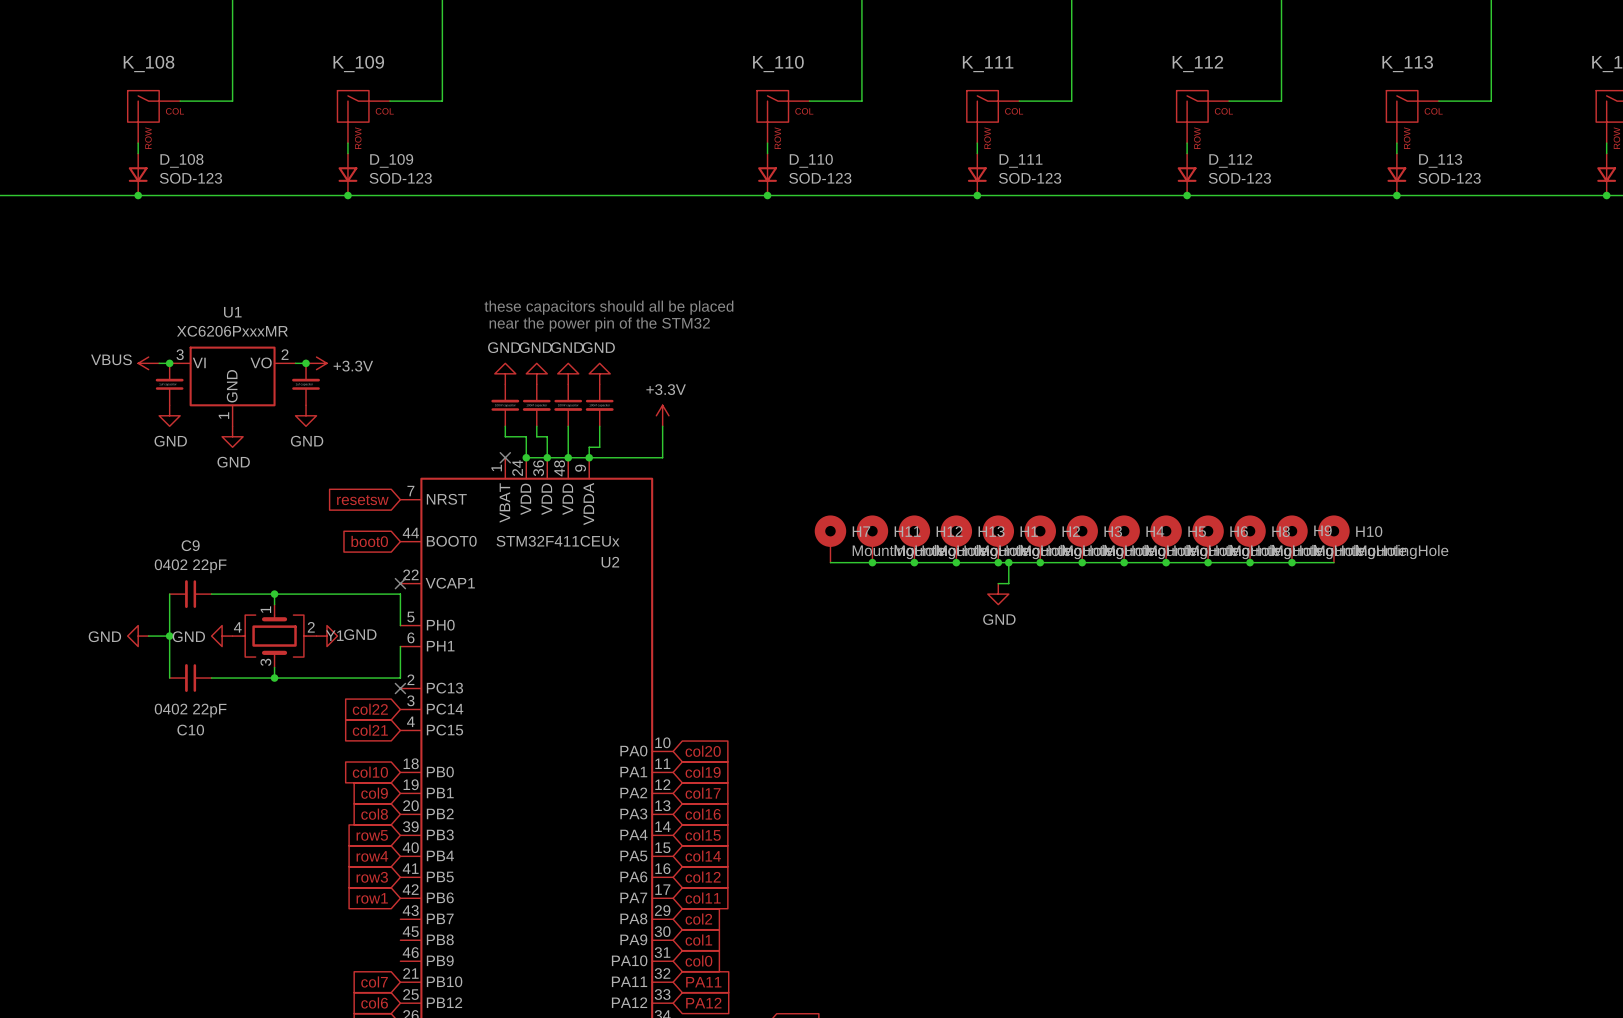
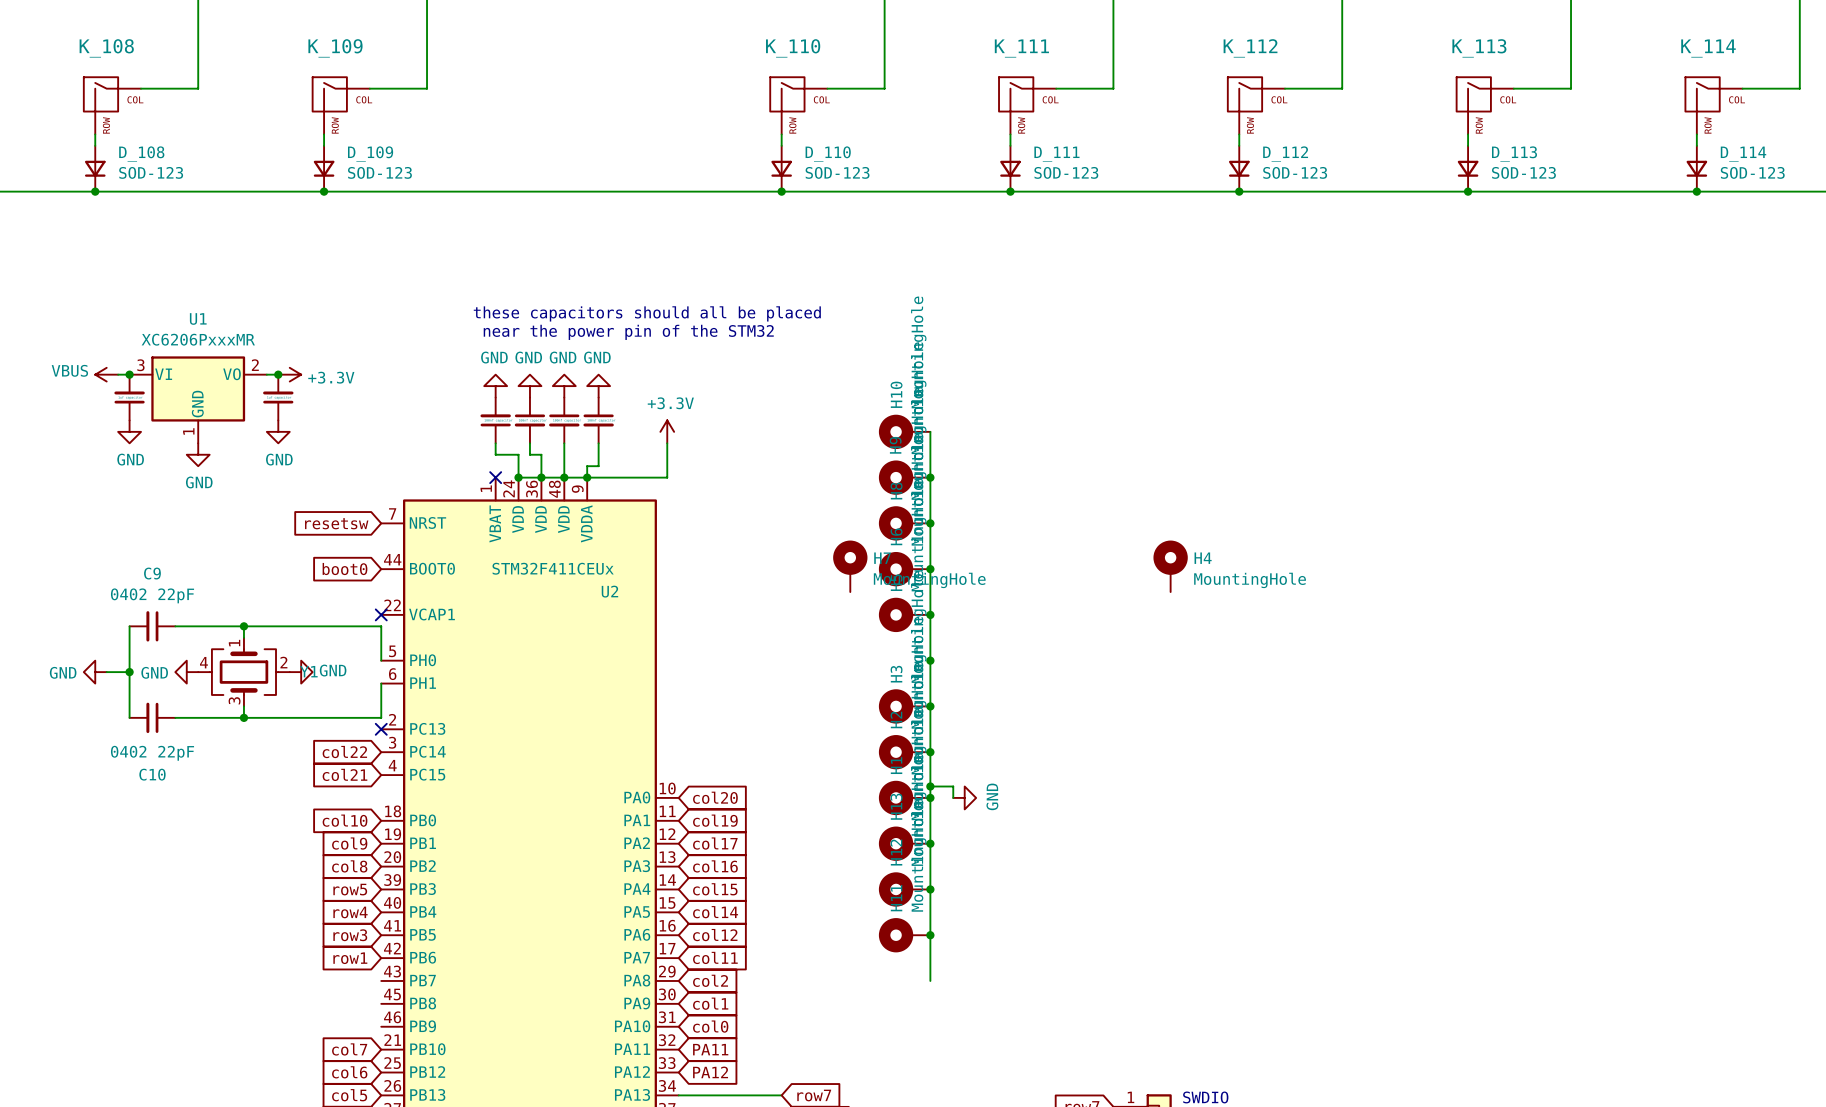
wire: none -> (930, 431) (930, 980)
junction: none -> (930, 477)
junction: none -> (930, 523)
H11 rotation: 0° (872, 531) -> 90° counterclockwise (896, 935)
H12 rotation: 0° (914, 531) -> 90° counterclockwise (896, 889)
H13 rotation: 0° (956, 531) -> 90° counterclockwise (896, 843)
H1 rotation: 0° (998, 531) -> 90° counterclockwise (896, 797)
H2 rotation: 0° (1040, 531) -> 90° counterclockwise (896, 752)
H3 rotation: 0° (1082, 531) -> 90° counterclockwise (896, 706)
H5 rotation: 0° (1166, 531) -> 90° counterclockwise (896, 614)
H6 rotation: 0° (1208, 531) -> 90° counterclockwise (896, 569)
H8 rotation: 0° (1250, 531) -> 90° counterclockwise (896, 523)
H9 rotation: 0° (1291, 531) -> 90° counterclockwise (896, 477)
H10 rotation: 0° (1333, 531) -> 90° counterclockwise (896, 431)
H11 position: (872, 539) -> (904, 935)
H12 position: (914, 539) -> (904, 889)
H13 position: (956, 539) -> (904, 843)
H1 position: (998, 539) -> (904, 797)
H2 position: (1040, 539) -> (904, 752)
H3 position: (1082, 539) -> (904, 706)
H5 position: (1166, 539) -> (904, 614)
H6 position: (1208, 539) -> (904, 569)
H8 position: (1250, 539) -> (904, 523)
H9 position: (1291, 539) -> (904, 477)
H10 position: (1333, 539) -> (904, 431)
junction: none -> (930, 569)
wire: (830, 562) (1333, 562) -> none
junction: (872, 562) -> none
junction: (914, 562) -> none
junction: (956, 562) -> none
junction: (998, 562) -> none
wire: (1008, 562) (1008, 583) (998, 583) -> none
junction: (1008, 562) -> none
junction: (1040, 562) -> none
junction: (1082, 562) -> none
junction: (1124, 562) -> none
junction: (1166, 562) -> none
junction: (1208, 562) -> none
junction: (1250, 562) -> none
junction: (1291, 562) -> none
junction: none -> (930, 614)
power symbol rotation: 0° (998, 594) -> 90° counterclockwise (964, 797)
power symbol position: GND (998, 594) -> GND (964, 797)
junction: none -> (930, 660)
junction: none -> (930, 706)
junction: none -> (930, 752)
wire: none -> (930, 786) (953, 786) (953, 797)
junction: none -> (930, 786)
junction: none -> (930, 797)
junction: none -> (930, 843)
junction: none -> (930, 889)
junction: none -> (930, 935)

